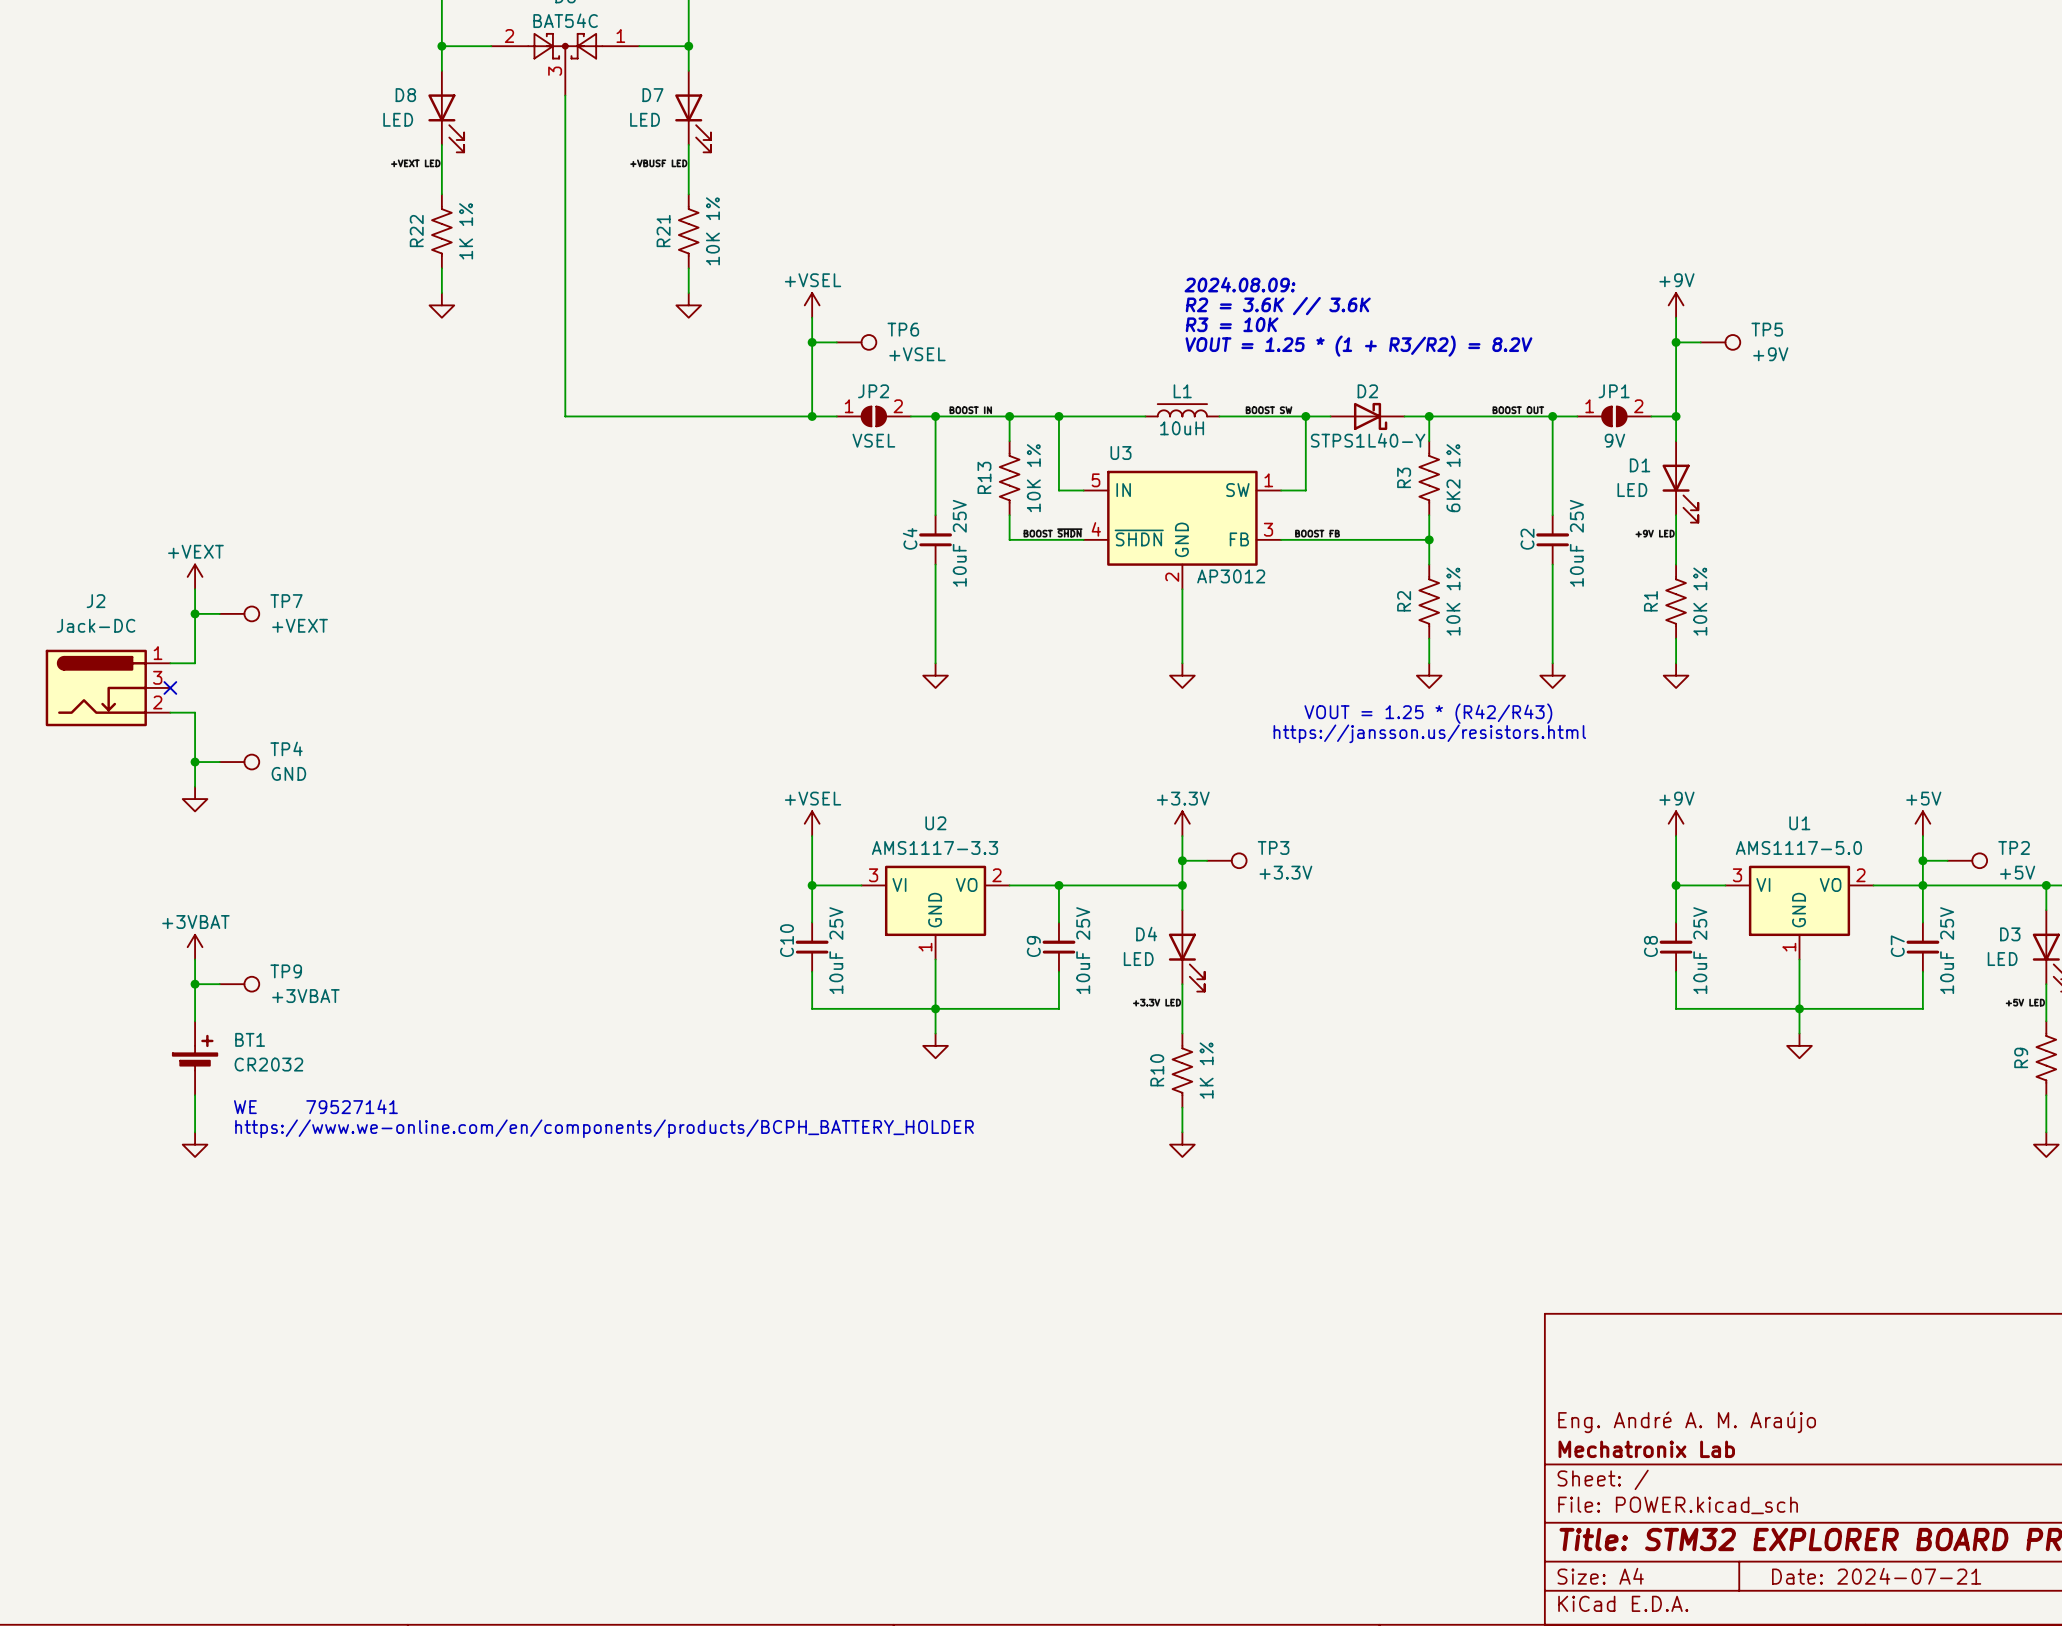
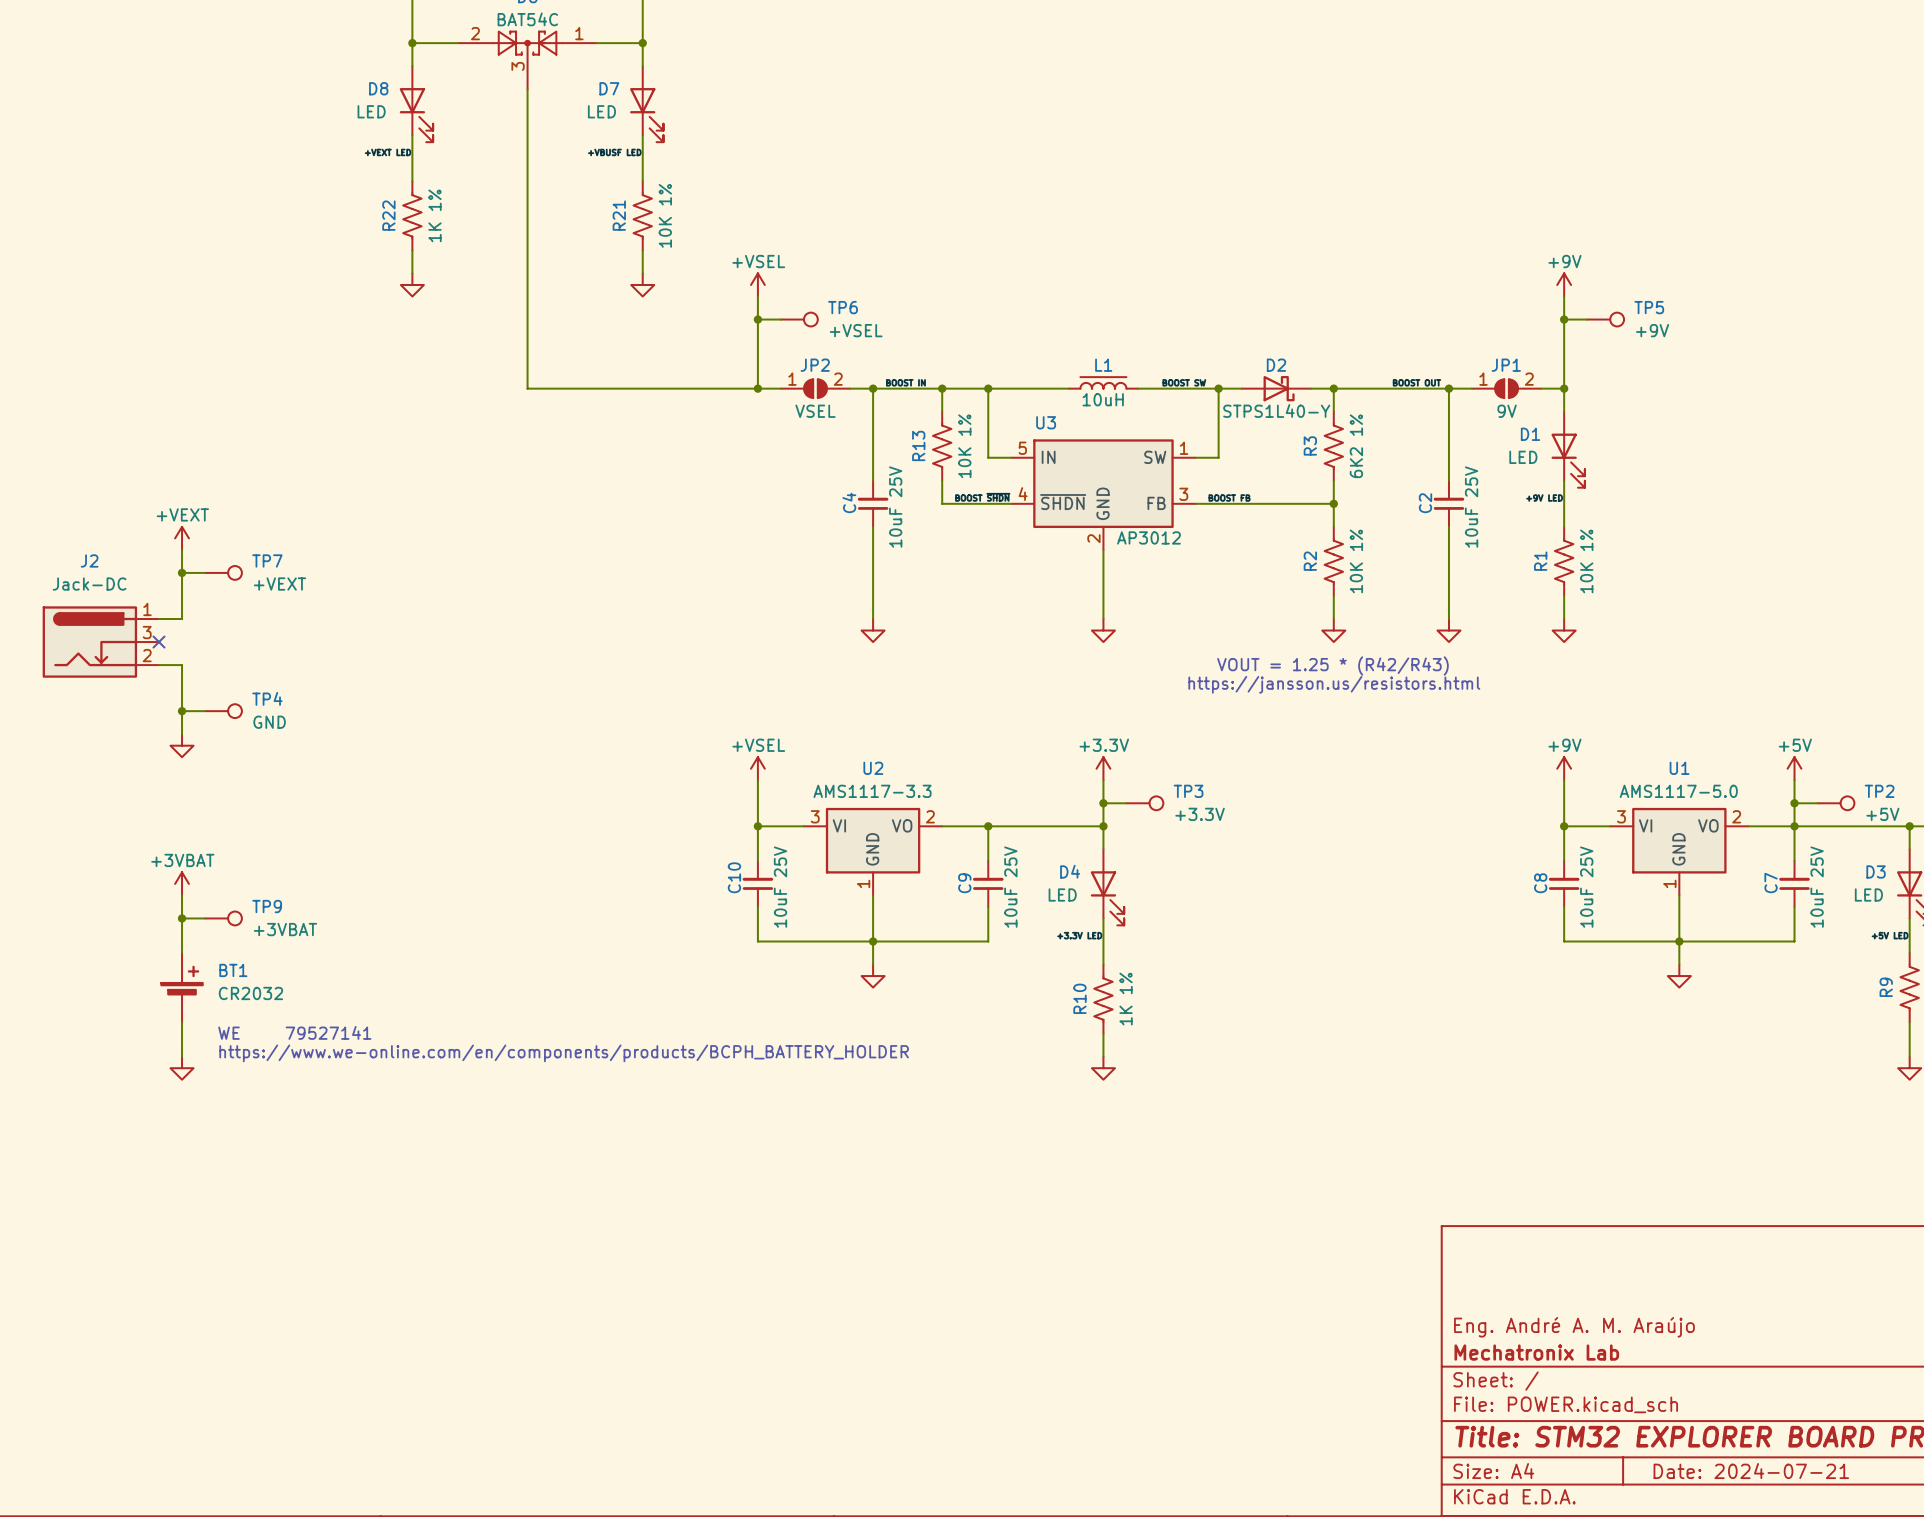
text: 2024.08.09: (1240, 284) -> none
text: R2 = 3.6K // 3.6K (1278, 306) -> none
text: R3 = 10K (1232, 324) -> none
text: VOUT = 1.25 * (1 + R3/R2) = 8.2V (1358, 346) -> none

